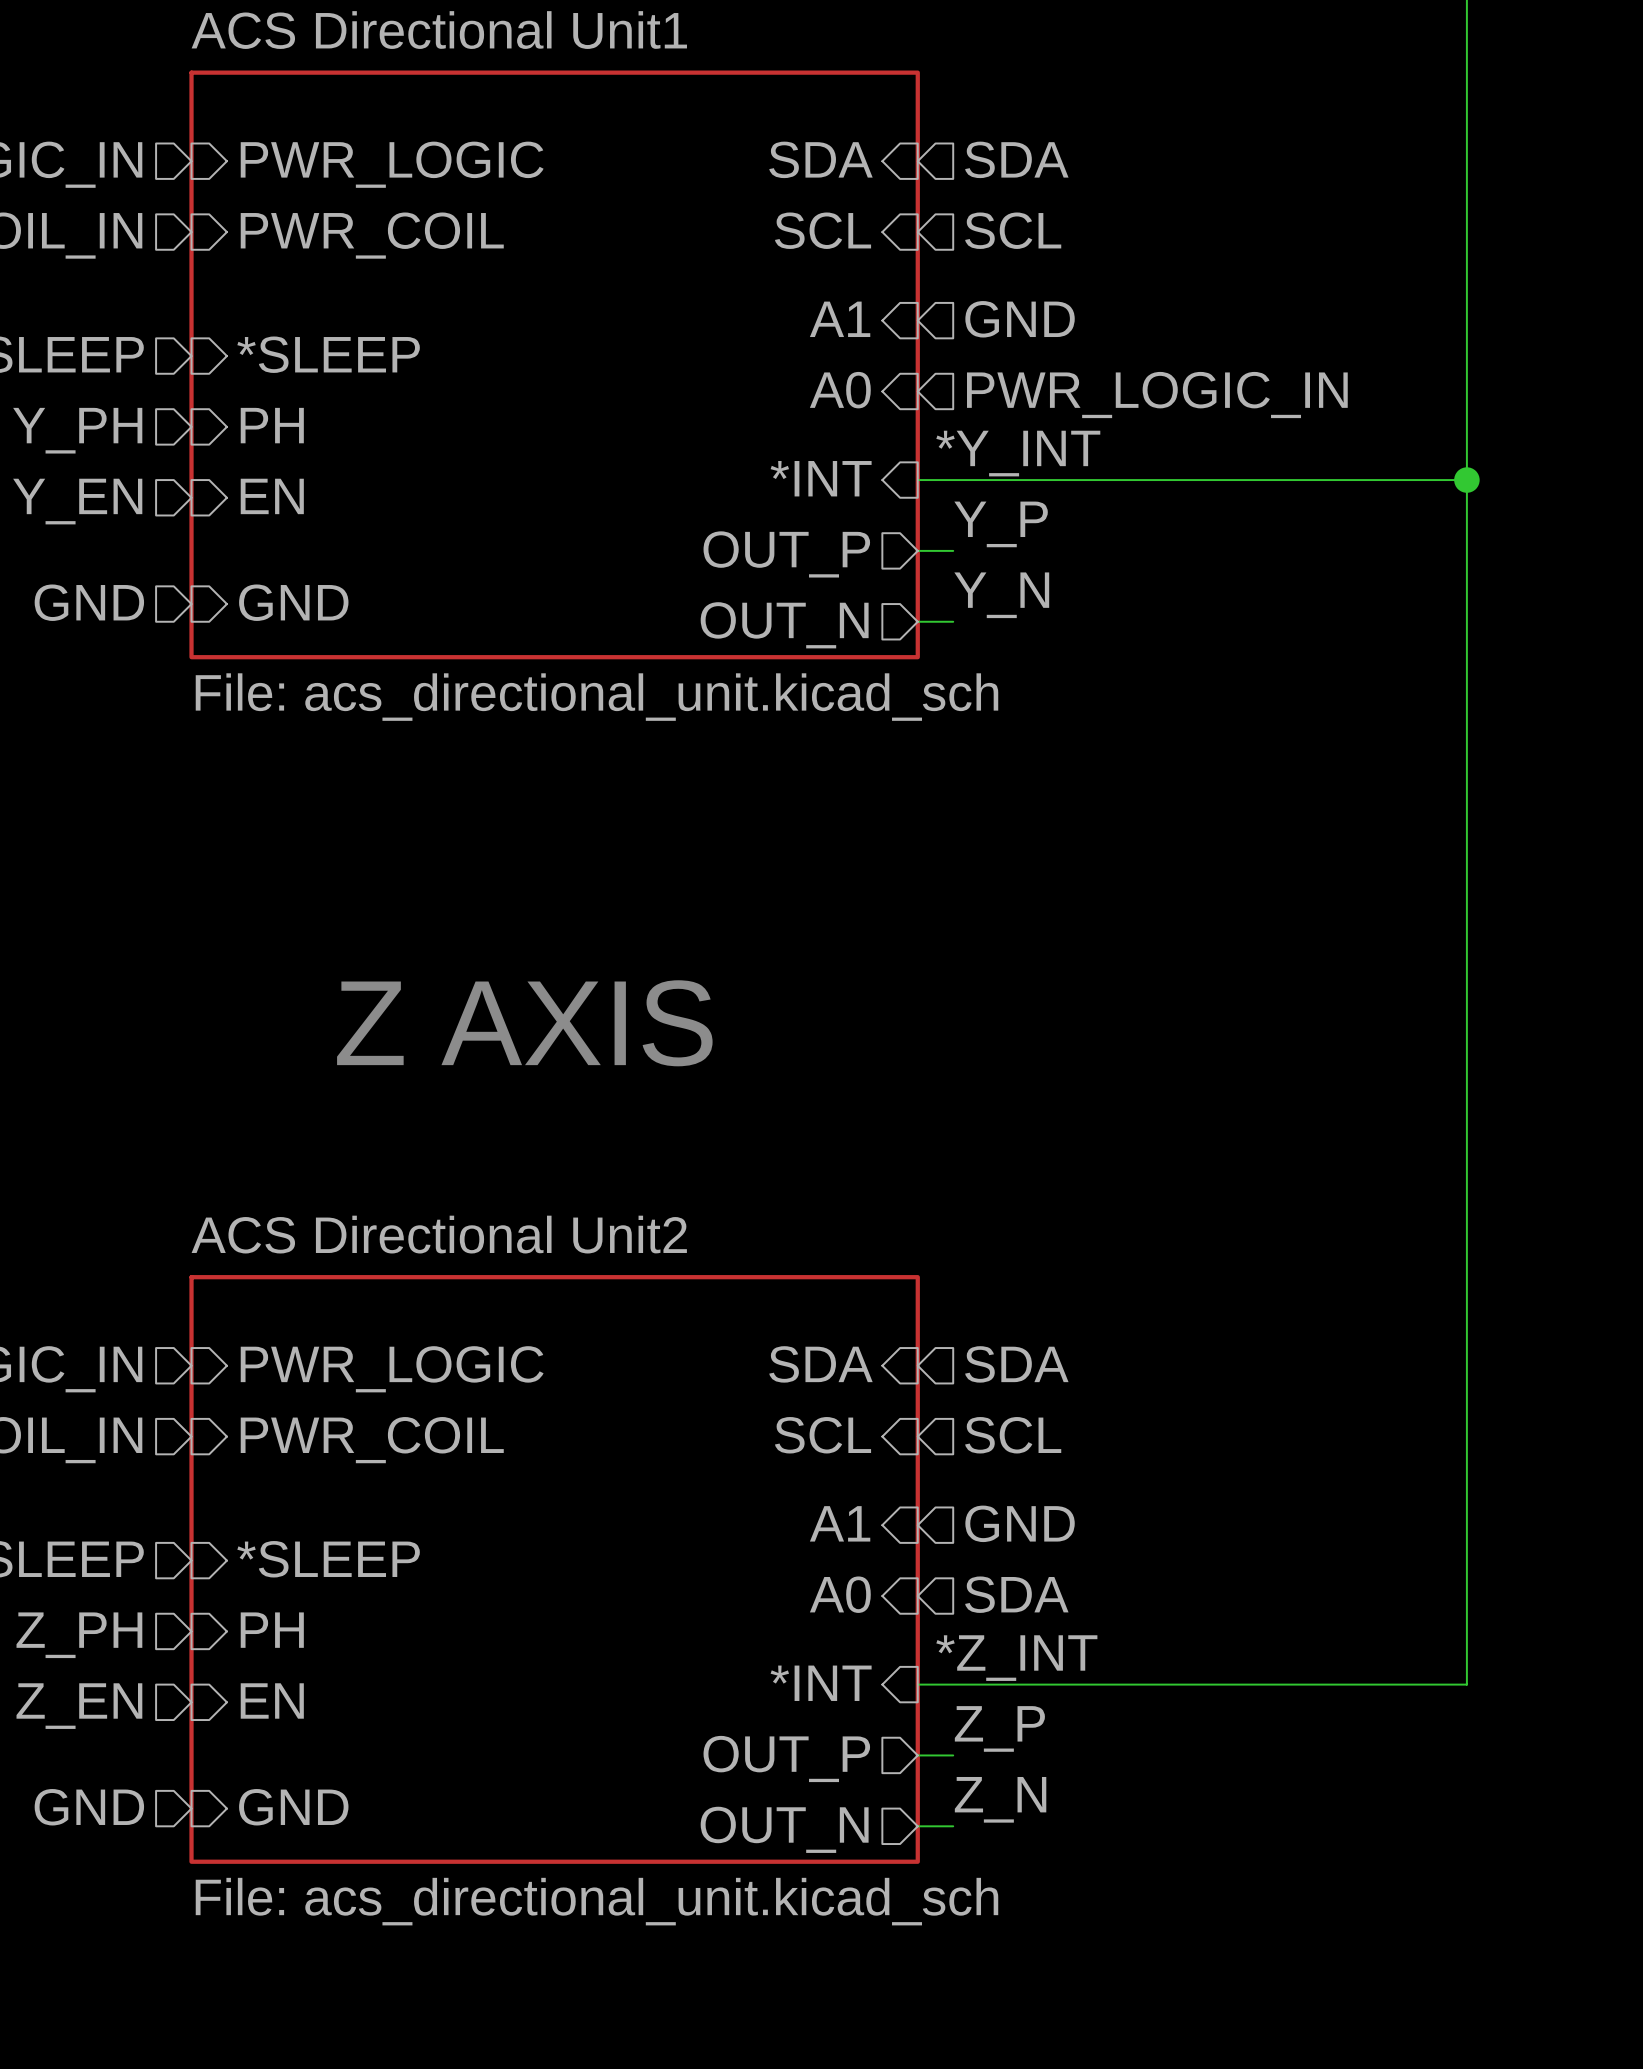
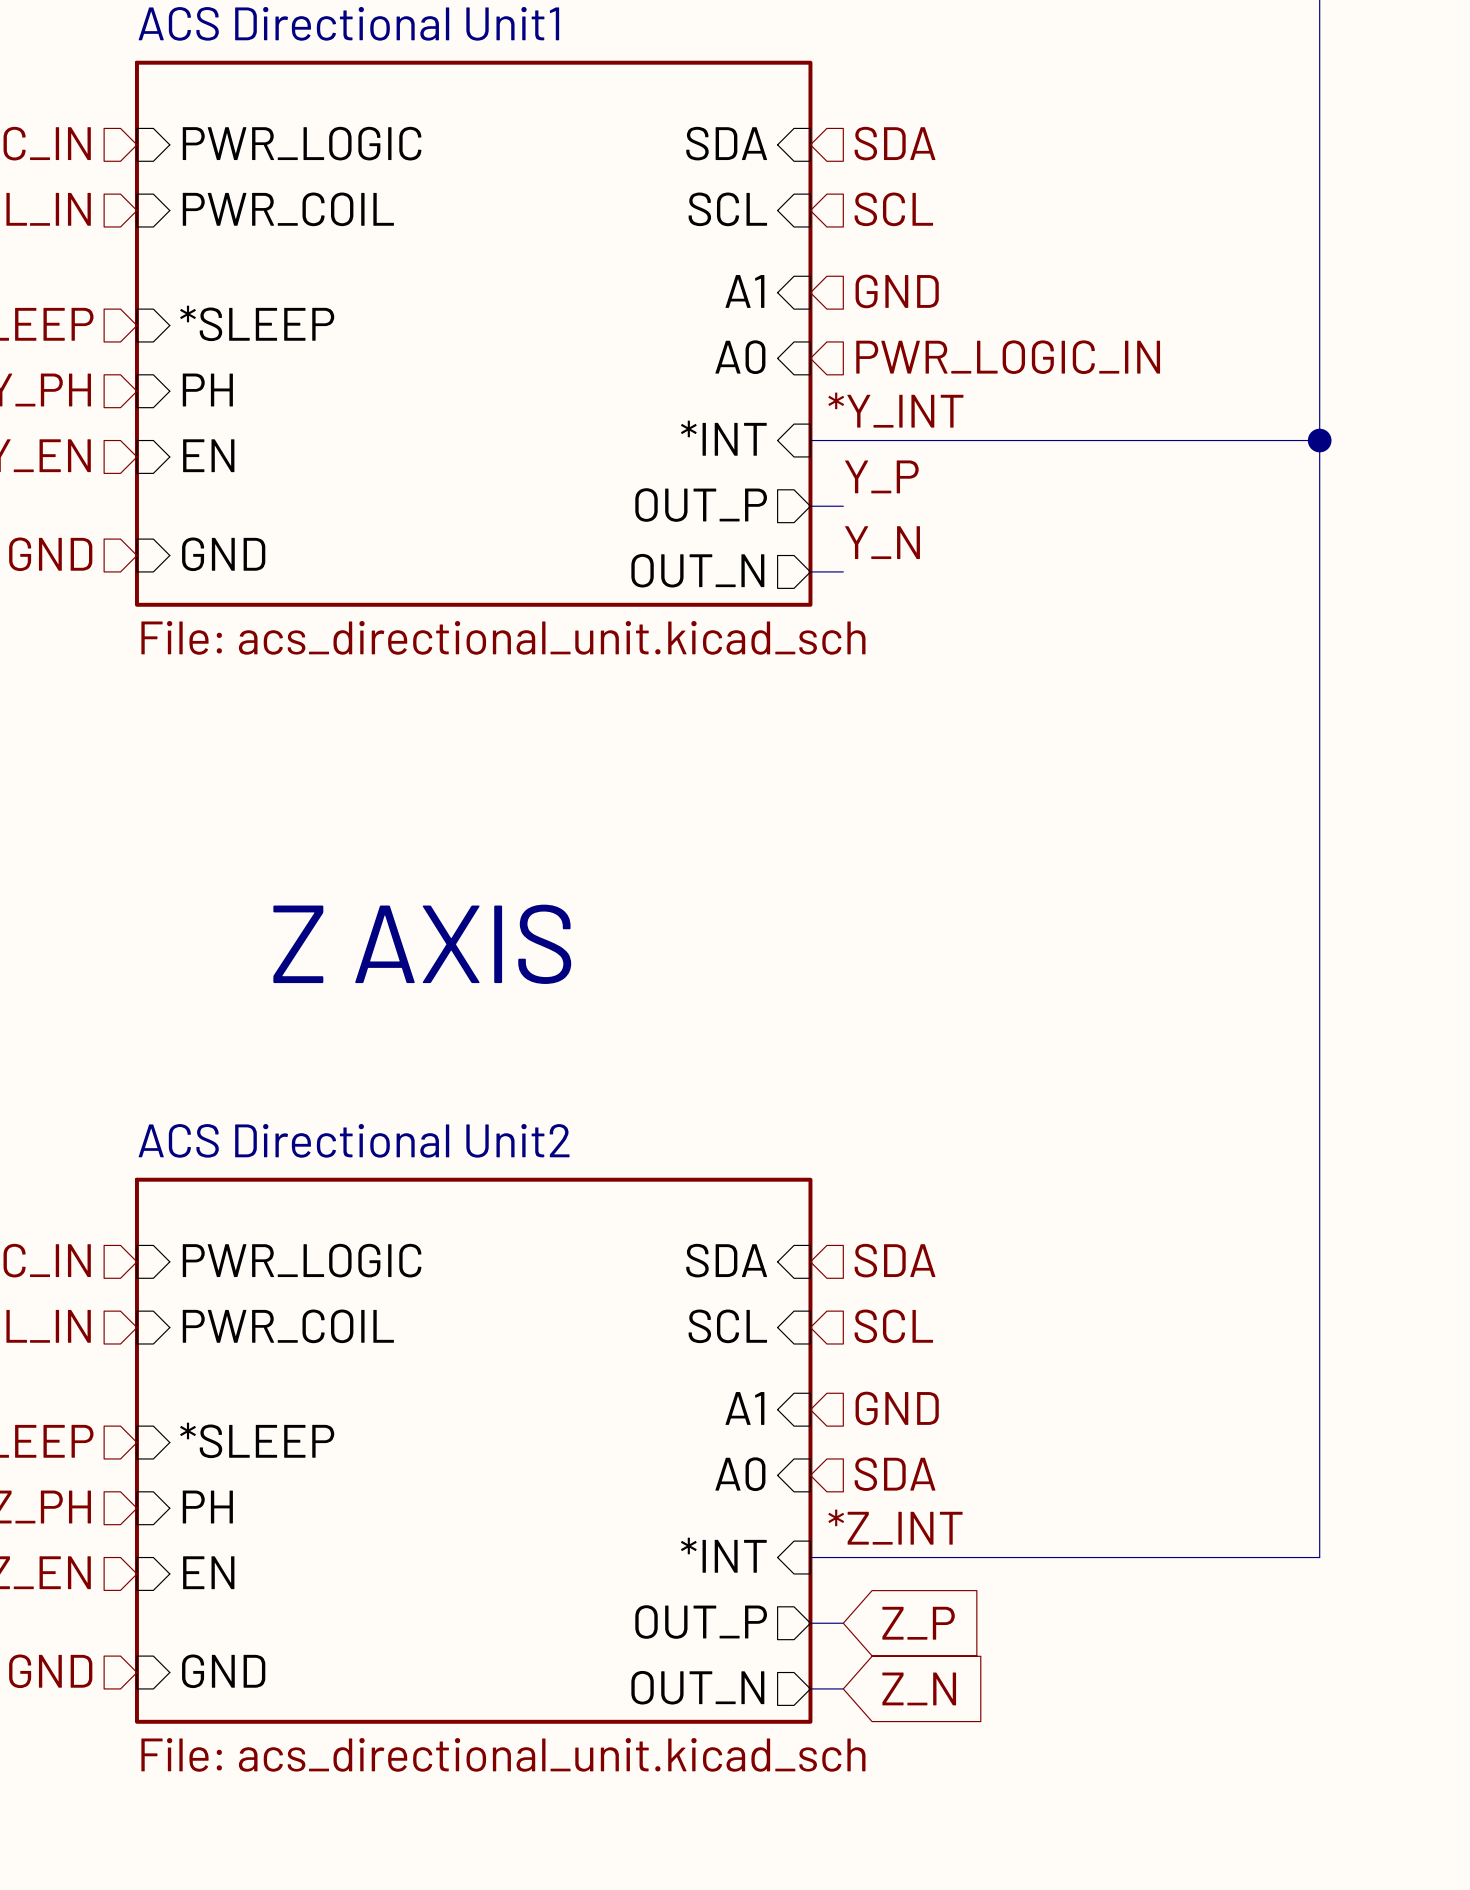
label: Z_P (999, 1728) -> none
global label: none -> Z_P (918, 1623)
label: Z_N (1000, 1799) -> none
global label: none -> Z_N (919, 1688)

